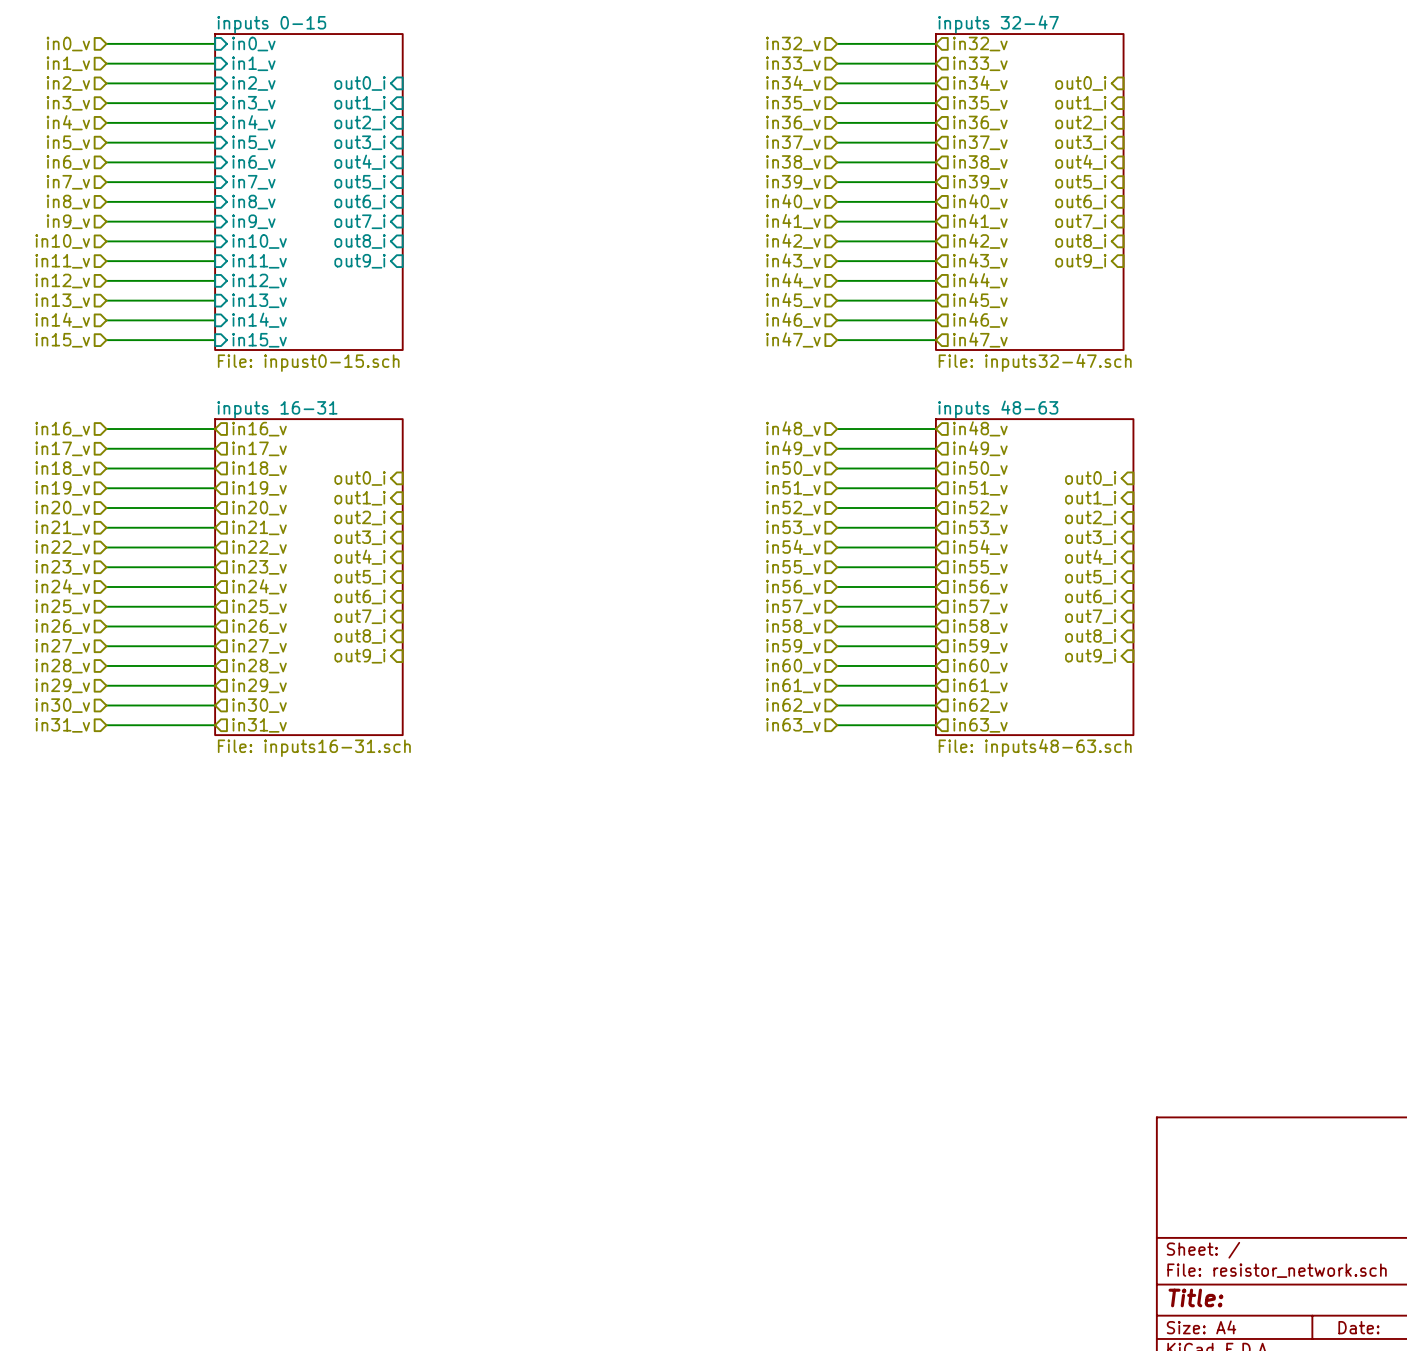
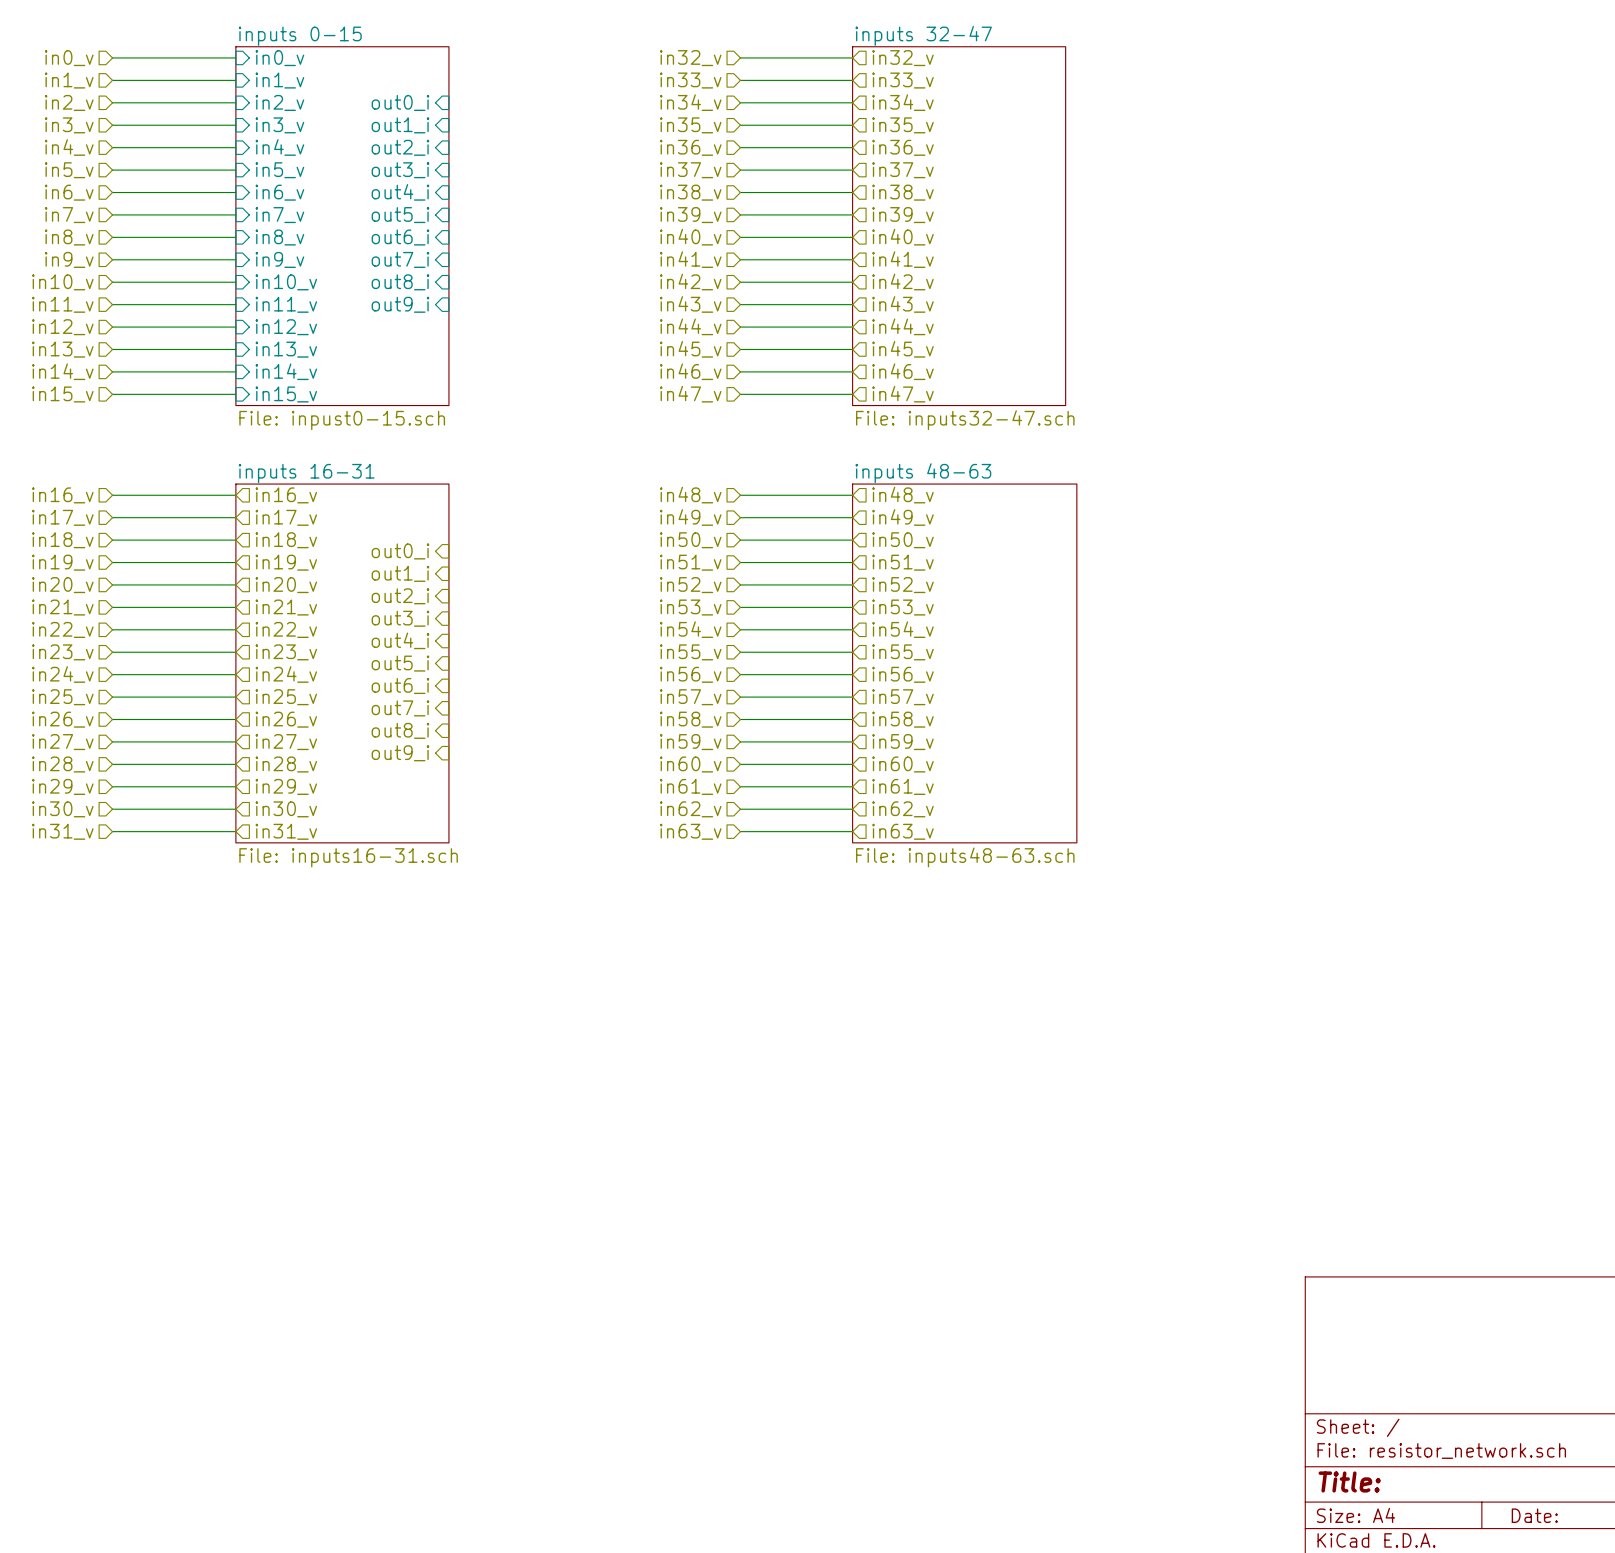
wire: (837, 43) (935, 43) -> (740, 57) (852, 57)
hierarchical label: none -> in32_v (690, 58)
hierarchical label rotation: 0° (793, 44) -> 180° (902, 58)
hierarchical label: in32_v (980, 44) -> none
hierarchical label: none -> in33_v (690, 80)
hierarchical label rotation: 0° (793, 63) -> 180° (902, 80)
wire: (837, 63) (935, 63) -> (740, 80) (852, 80)
hierarchical label: in33_v (980, 63) -> none
hierarchical label: none -> in34_v (690, 102)
hierarchical label rotation: 0° (793, 83) -> 180° (902, 102)
wire: (837, 83) (935, 83) -> (740, 102) (852, 102)
hierarchical label: in34_v (980, 83) -> none
hierarchical label: out0_i (1080, 83) -> none
hierarchical label: none -> in35_v (690, 125)
hierarchical label rotation: 0° (793, 103) -> 180° (902, 125)
wire: (837, 103) (935, 103) -> (740, 125) (852, 125)
hierarchical label: in35_v (980, 103) -> none
hierarchical label: out1_i (1080, 103) -> none
wire: (837, 122) (935, 122) -> (740, 147) (852, 147)
hierarchical label: none -> in36_v (690, 147)
hierarchical label rotation: 0° (793, 123) -> 180° (902, 147)
hierarchical label: in36_v (980, 123) -> none
hierarchical label: out2_i (1080, 123) -> none
hierarchical label: none -> in37_v (690, 170)
hierarchical label rotation: 0° (793, 142) -> 180° (902, 170)
wire: (837, 142) (935, 142) -> (740, 170) (852, 170)
hierarchical label: in37_v (980, 142) -> none
hierarchical label: out3_i (1080, 142) -> none
hierarchical label: none -> in38_v (690, 192)
hierarchical label rotation: 0° (793, 162) -> 180° (902, 192)
wire: (837, 162) (935, 162) -> (740, 192) (852, 192)
hierarchical label: in38_v (980, 162) -> none
hierarchical label: out4_i (1080, 162) -> none
hierarchical label: none -> in39_v (690, 215)
hierarchical label rotation: 0° (793, 182) -> 180° (902, 215)
wire: (837, 182) (935, 182) -> (740, 214) (852, 214)
hierarchical label: in39_v (980, 182) -> none
hierarchical label: out5_i (1080, 182) -> none
sheet inputs 32-47 position: (1029, 192) -> (959, 226)
hierarchical label: none -> in40_v (690, 237)
hierarchical label rotation: 0° (793, 201) -> 180° (902, 237)
wire: (837, 201) (935, 201) -> (740, 237) (852, 237)
hierarchical label: in40_v (980, 201) -> none
hierarchical label: out6_i (1080, 202) -> none
hierarchical label: none -> in41_v (690, 259)
hierarchical label rotation: 0° (793, 221) -> 180° (902, 259)
wire: (837, 221) (935, 221) -> (740, 259) (852, 259)
hierarchical label: in41_v (980, 221) -> none
hierarchical label: out7_i (1080, 221) -> none
hierarchical label: none -> in42_v (690, 282)
hierarchical label rotation: 0° (793, 241) -> 180° (902, 282)
wire: (837, 241) (935, 241) -> (740, 282) (852, 282)
hierarchical label: in42_v (980, 241) -> none
hierarchical label: out8_i (1080, 241) -> none
hierarchical label: none -> in43_v (690, 304)
hierarchical label rotation: 0° (793, 260) -> 180° (902, 304)
hierarchical label: in43_v (980, 260) -> none
wire: (837, 261) (935, 261) -> (740, 304) (852, 304)
hierarchical label: out9_i (1080, 261) -> none
hierarchical label: none -> in44_v (690, 326)
hierarchical label rotation: 0° (793, 280) -> 180° (902, 326)
wire: (837, 280) (935, 280) -> (740, 327) (852, 327)
hierarchical label: in44_v (980, 280) -> none
hierarchical label: none -> in45_v (690, 349)
hierarchical label rotation: 0° (793, 300) -> 180° (902, 349)
wire: (837, 300) (935, 300) -> (740, 349) (852, 349)
hierarchical label: in45_v (980, 300) -> none
hierarchical label: none -> in46_v (690, 371)
hierarchical label rotation: 0° (793, 320) -> 180° (902, 371)
wire: (837, 320) (935, 320) -> (740, 371) (852, 371)
hierarchical label: in46_v (980, 320) -> none
hierarchical label: none -> in47_v (690, 394)
hierarchical label rotation: 0° (793, 339) -> 180° (902, 394)
hierarchical label: in47_v (980, 339) -> none
wire: (837, 340) (935, 340) -> (740, 394) (852, 394)
hierarchical label: none -> in48_v (690, 495)
hierarchical label rotation: 0° (793, 428) -> 180° (902, 495)
hierarchical label: in48_v (980, 428) -> none
wire: (837, 429) (935, 429) -> (740, 495) (852, 495)
hierarchical label: none -> in49_v (690, 517)
hierarchical label rotation: 0° (793, 448) -> 180° (902, 517)
wire: (837, 448) (935, 448) -> (740, 517) (852, 517)
hierarchical label: in49_v (980, 448) -> none
hierarchical label: none -> in50_v (690, 540)
hierarchical label rotation: 0° (793, 468) -> 180° (902, 540)
wire: (837, 468) (935, 468) -> (740, 540) (852, 540)
hierarchical label: in50_v (980, 468) -> none
hierarchical label: out0_i (1090, 478) -> none
hierarchical label: none -> in51_v (690, 562)
hierarchical label rotation: 0° (793, 488) -> 180° (902, 562)
wire: (837, 488) (935, 488) -> (740, 562) (852, 562)
hierarchical label: in51_v (980, 488) -> none
hierarchical label: out1_i (1090, 498) -> none
hierarchical label: none -> in52_v (690, 585)
hierarchical label rotation: 0° (793, 508) -> 180° (902, 585)
wire: (837, 508) (935, 508) -> (740, 584) (852, 584)
hierarchical label: in52_v (980, 508) -> none
hierarchical label: out2_i (1090, 517) -> none
hierarchical label: none -> in53_v (690, 607)
hierarchical label rotation: 0° (793, 527) -> 180° (902, 607)
wire: (837, 527) (935, 527) -> (740, 607) (852, 607)
hierarchical label: in53_v (980, 527) -> none
hierarchical label: out3_i (1090, 537) -> none
hierarchical label: none -> in54_v (690, 629)
hierarchical label rotation: 0° (793, 547) -> 180° (902, 629)
wire: (837, 547) (935, 547) -> (740, 629) (852, 629)
hierarchical label: in54_v (980, 547) -> none
hierarchical label: out4_i (1090, 557) -> none
hierarchical label: none -> in55_v (690, 652)
hierarchical label rotation: 0° (793, 567) -> 180° (902, 652)
wire: (837, 567) (935, 567) -> (740, 652) (852, 652)
hierarchical label: in55_v (980, 567) -> none
sheet inputs 48-63 position: (1034, 577) -> (964, 663)
hierarchical label: out5_i (1090, 577) -> none
wire: (837, 586) (935, 586) -> (740, 674) (852, 674)
hierarchical label: none -> in56_v (690, 674)
hierarchical label rotation: 0° (793, 587) -> 180° (902, 674)
hierarchical label: in56_v (980, 587) -> none
hierarchical label: out6_i (1090, 596) -> none
hierarchical label: none -> in57_v (690, 697)
hierarchical label rotation: 0° (793, 606) -> 180° (902, 697)
wire: (837, 606) (935, 606) -> (740, 697) (852, 697)
hierarchical label: in57_v (980, 606) -> none
hierarchical label: out7_i (1090, 616) -> none
hierarchical label: none -> in58_v (690, 719)
hierarchical label rotation: 0° (793, 626) -> 180° (902, 719)
wire: (837, 626) (935, 626) -> (740, 719) (852, 719)
hierarchical label: in58_v (980, 626) -> none
hierarchical label: out8_i (1090, 636) -> none
hierarchical label: none -> in59_v (690, 742)
hierarchical label rotation: 0° (793, 646) -> 180° (902, 742)
wire: (837, 646) (935, 646) -> (740, 741) (852, 741)
hierarchical label: in59_v (980, 646) -> none
hierarchical label: out9_i (1090, 656) -> none
wire: (837, 665) (935, 665) -> (740, 764) (852, 764)
hierarchical label: none -> in60_v (690, 764)
hierarchical label rotation: 0° (793, 666) -> 180° (902, 764)
hierarchical label: in60_v (980, 666) -> none
hierarchical label: none -> in61_v (690, 786)
hierarchical label rotation: 0° (793, 685) -> 180° (902, 786)
wire: (837, 685) (935, 685) -> (740, 786) (852, 786)
hierarchical label: in61_v (980, 685) -> none
hierarchical label: none -> in62_v (690, 809)
hierarchical label rotation: 0° (793, 705) -> 180° (902, 809)
wire: (837, 705) (935, 705) -> (740, 809) (852, 809)
hierarchical label: in62_v (980, 705) -> none
hierarchical label: none -> in63_v (690, 831)
hierarchical label rotation: 0° (793, 725) -> 180° (902, 831)
wire: (837, 725) (935, 725) -> (740, 831) (852, 831)
hierarchical label: in63_v (980, 725) -> none

